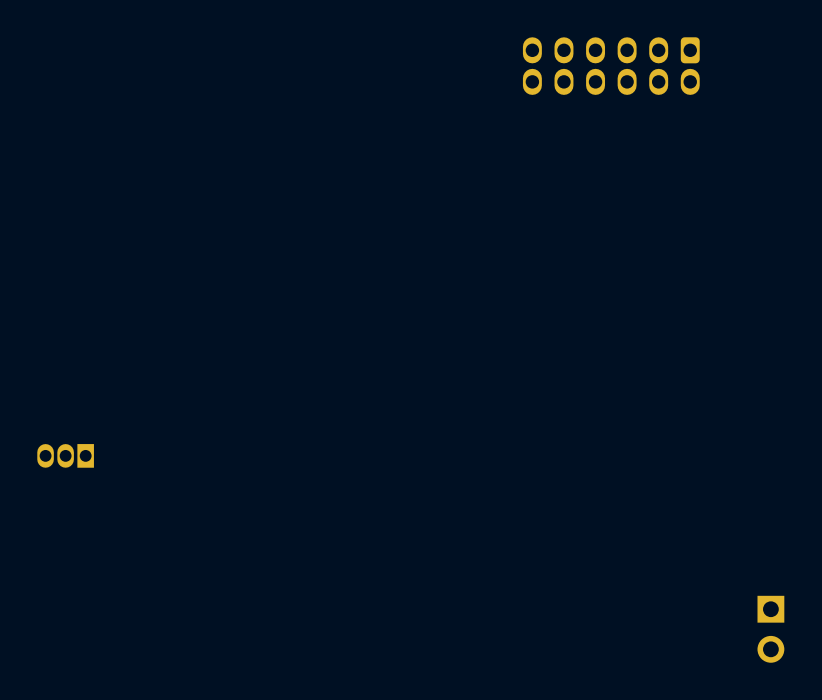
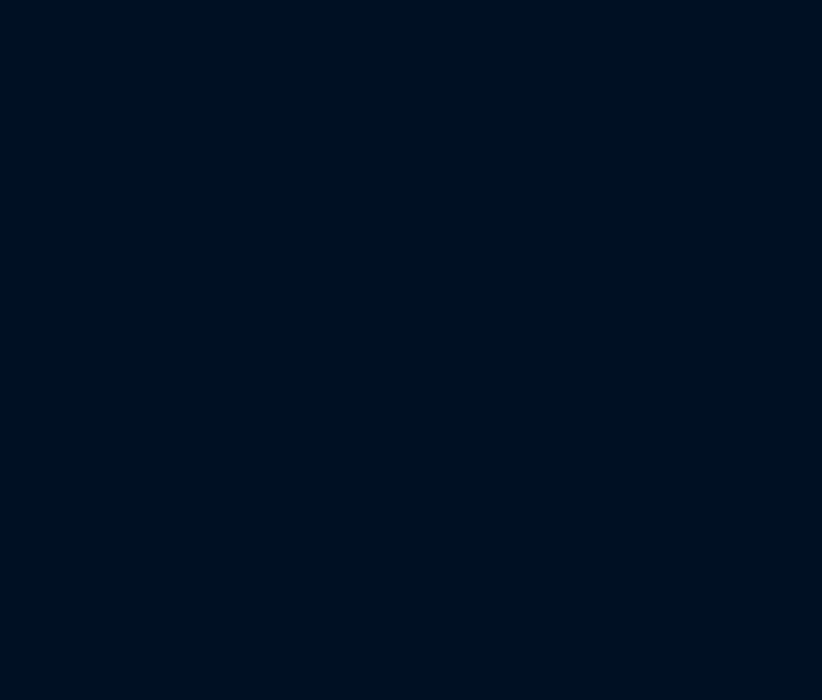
part: (611, 66) -> none
part: (65, 455) -> none
part: (770, 629) -> none

